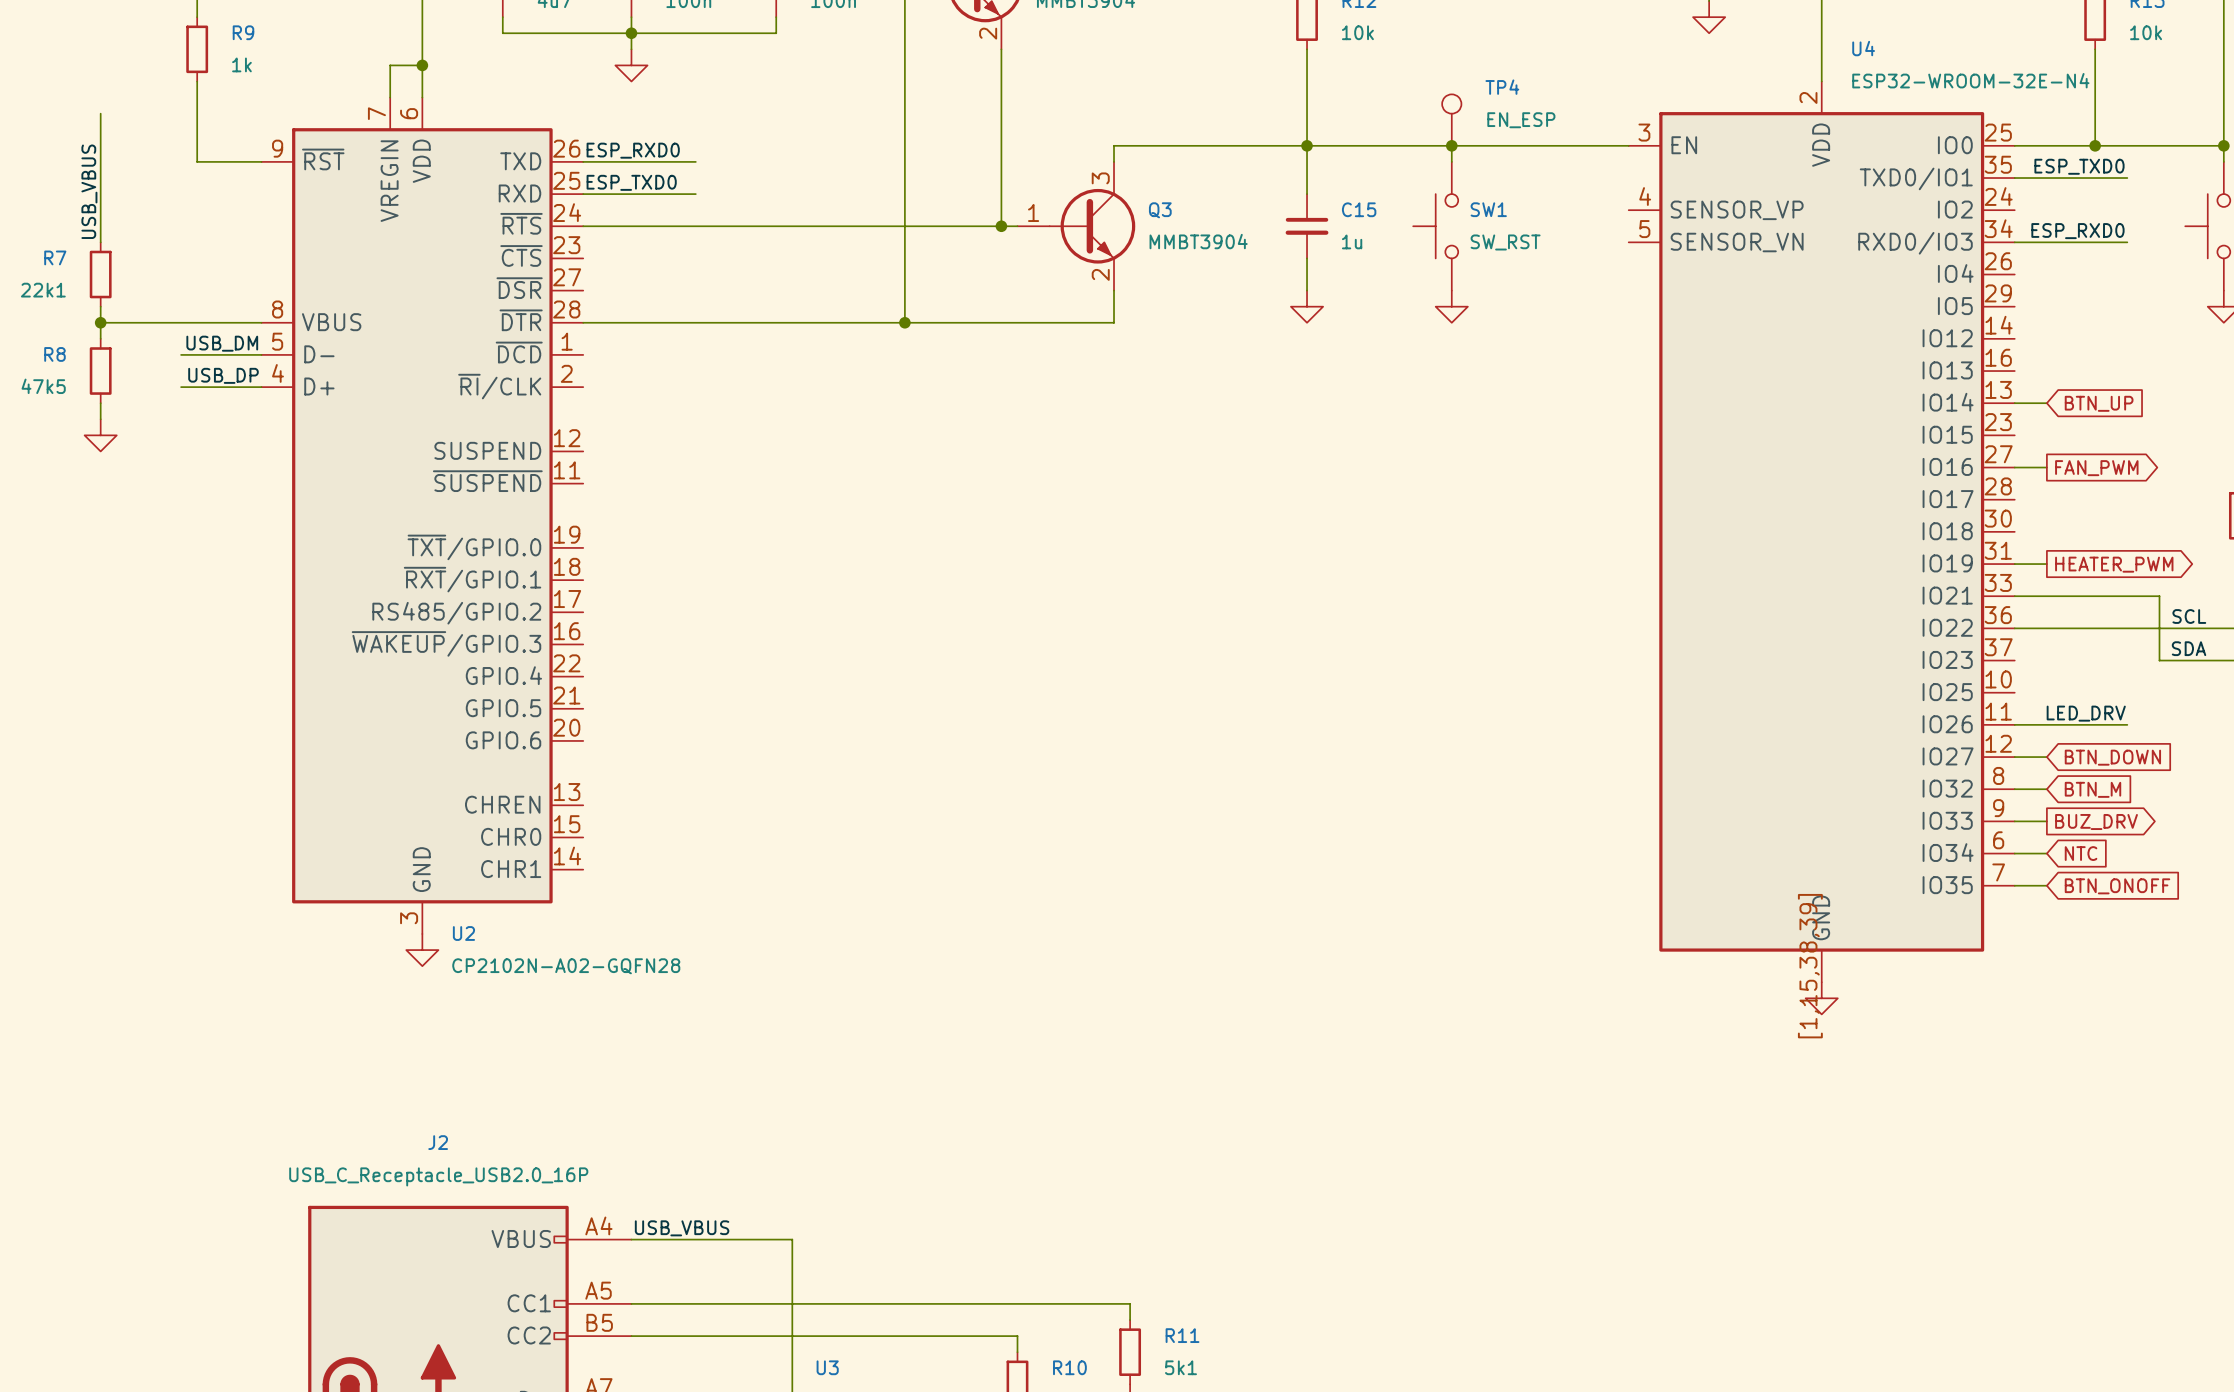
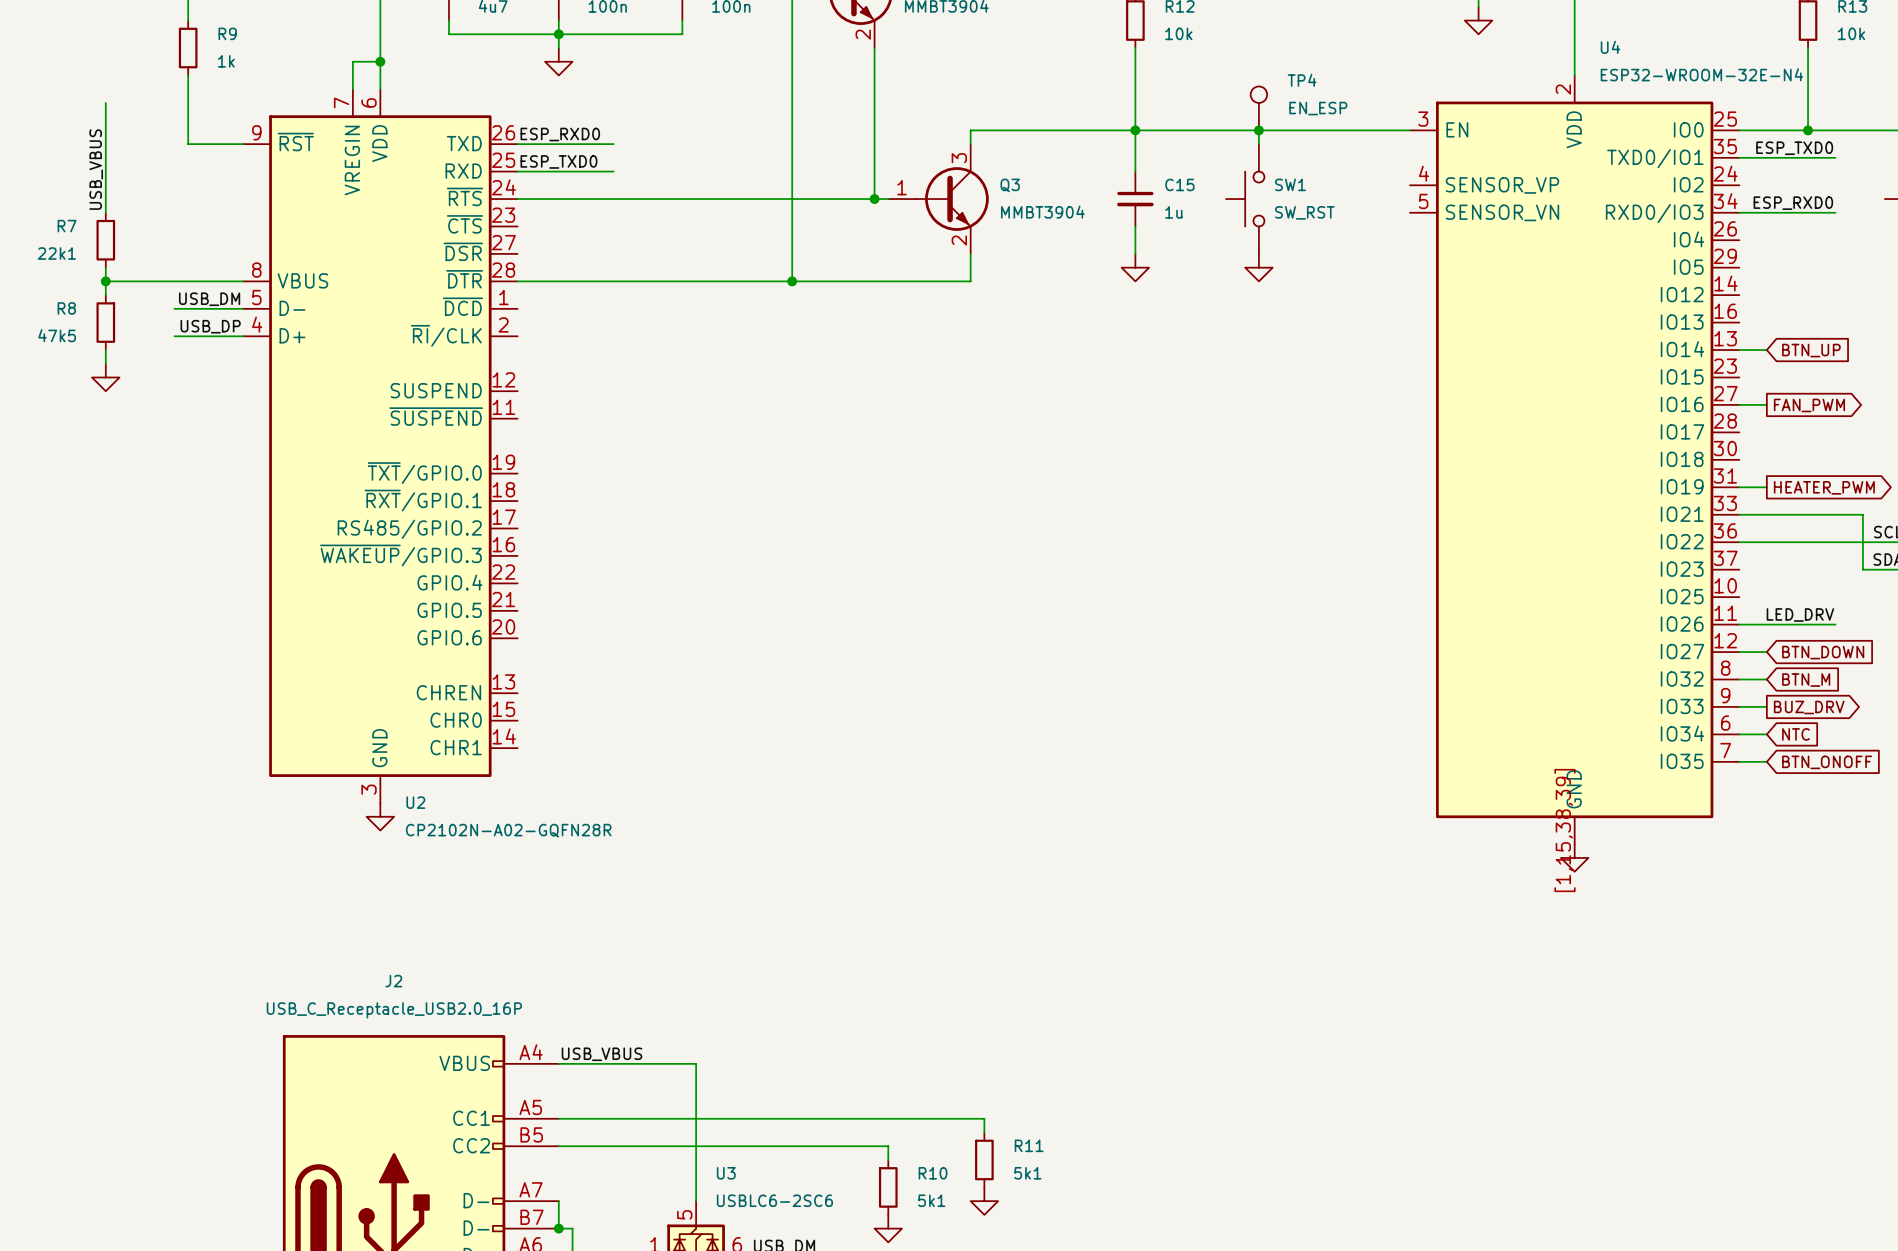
U2 value: CP2102N-A02-GQFN28 (566, 966) -> CP2102N-A02-GQFN28R (508, 830)

